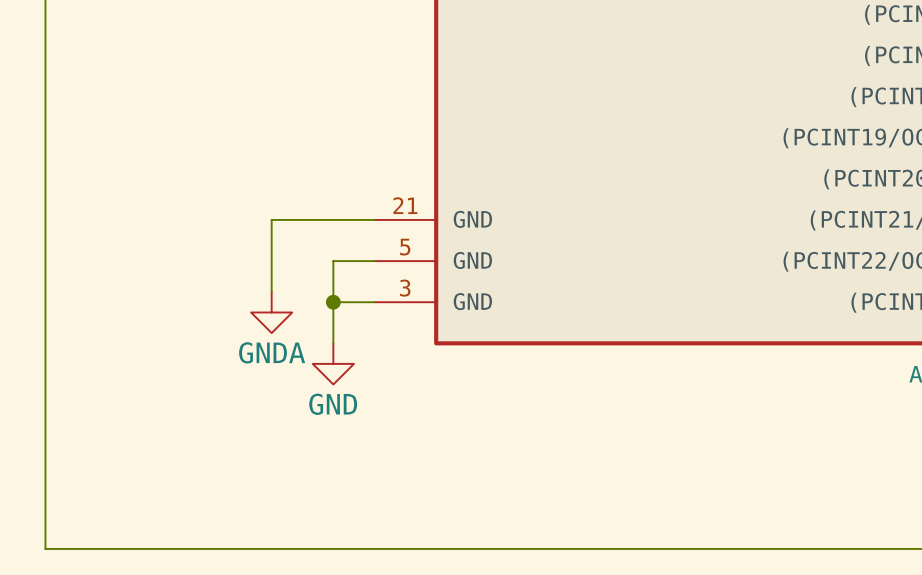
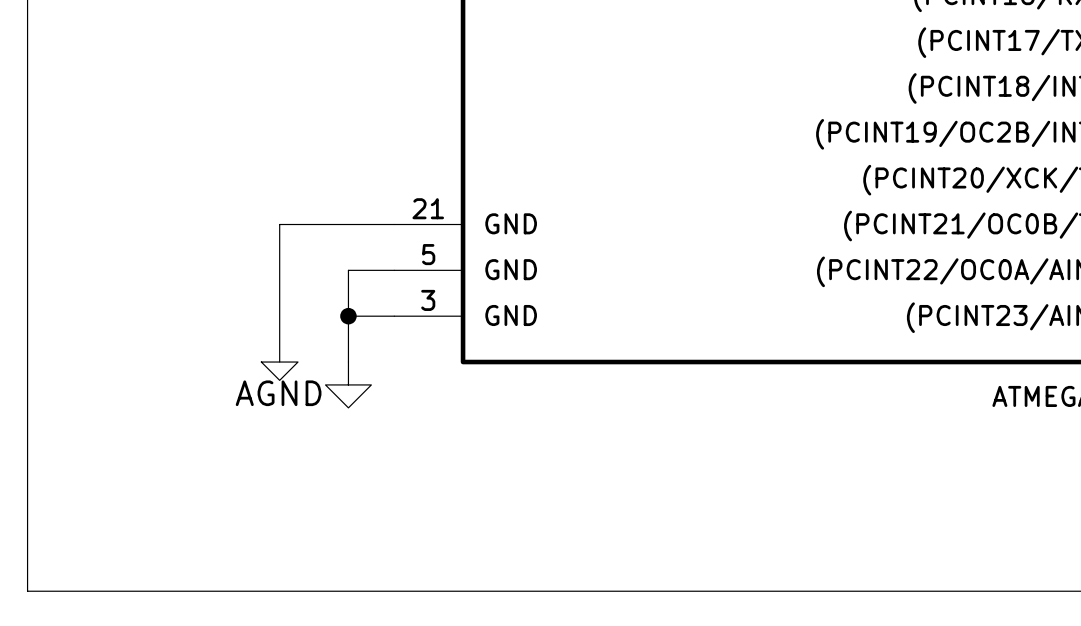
wire: none -> (279, 304) (279, 362)
power symbol: GNDA (271, 312) -> none
power symbol: none -> AGND (279, 371)
power symbol text: GND (333, 404) -> none

